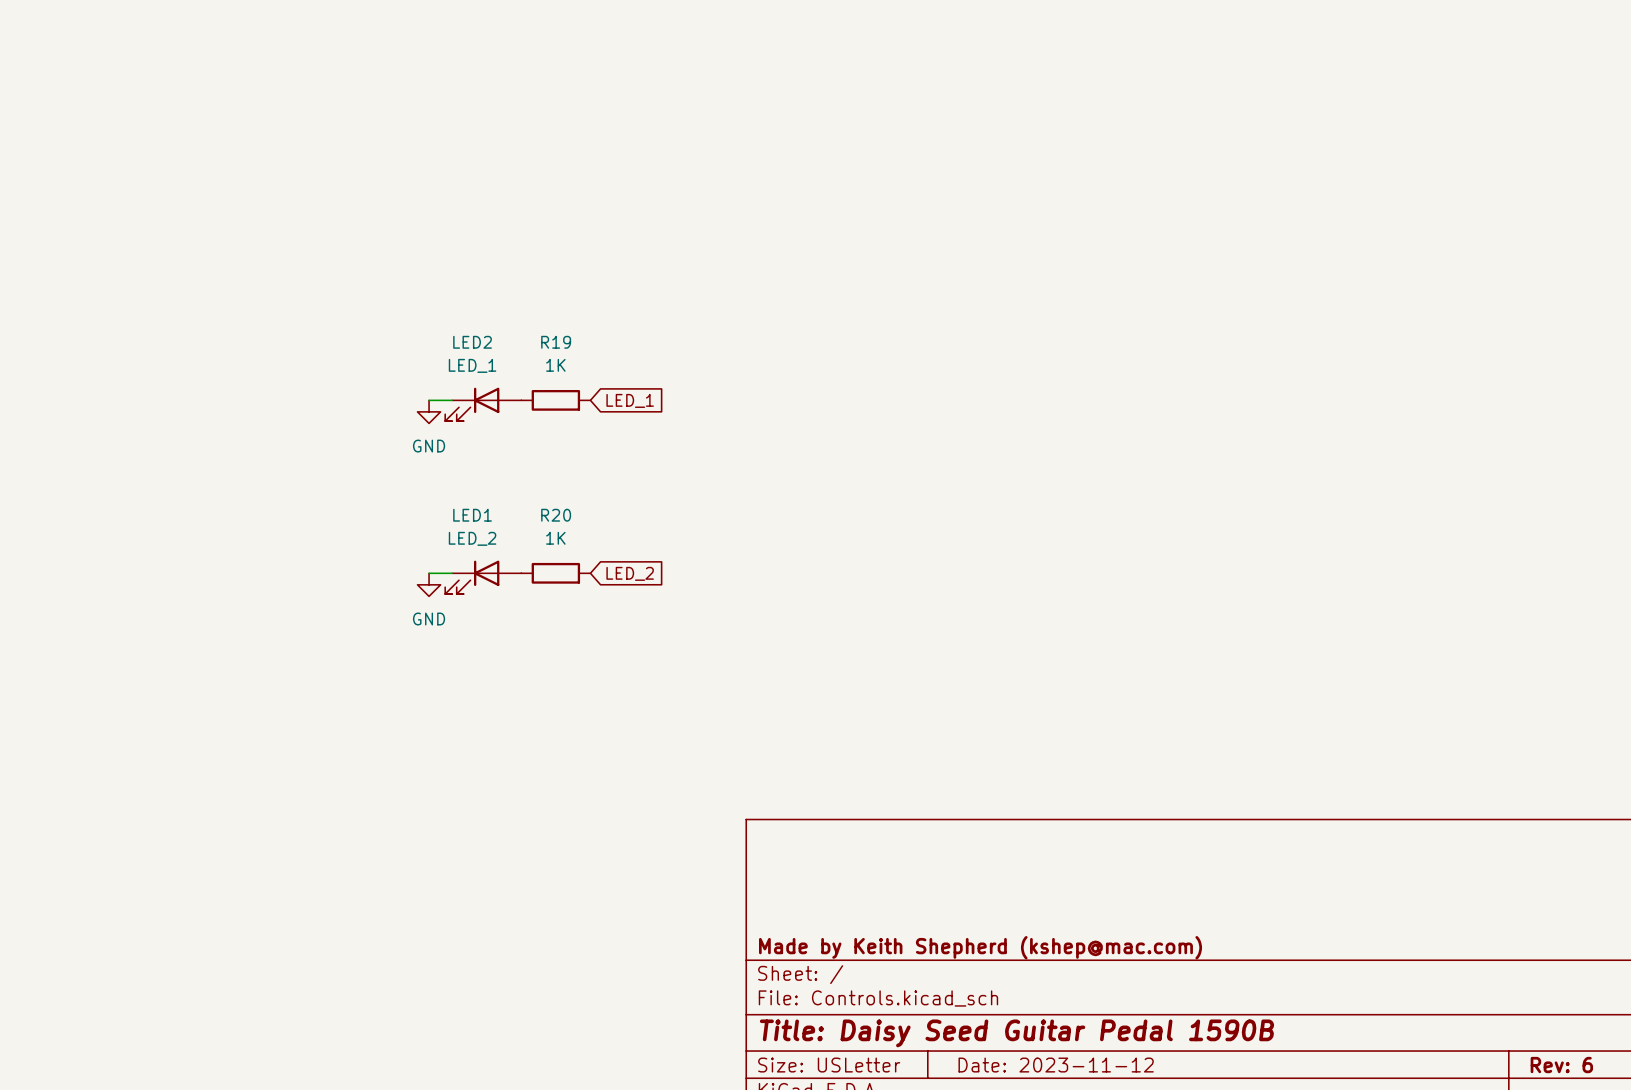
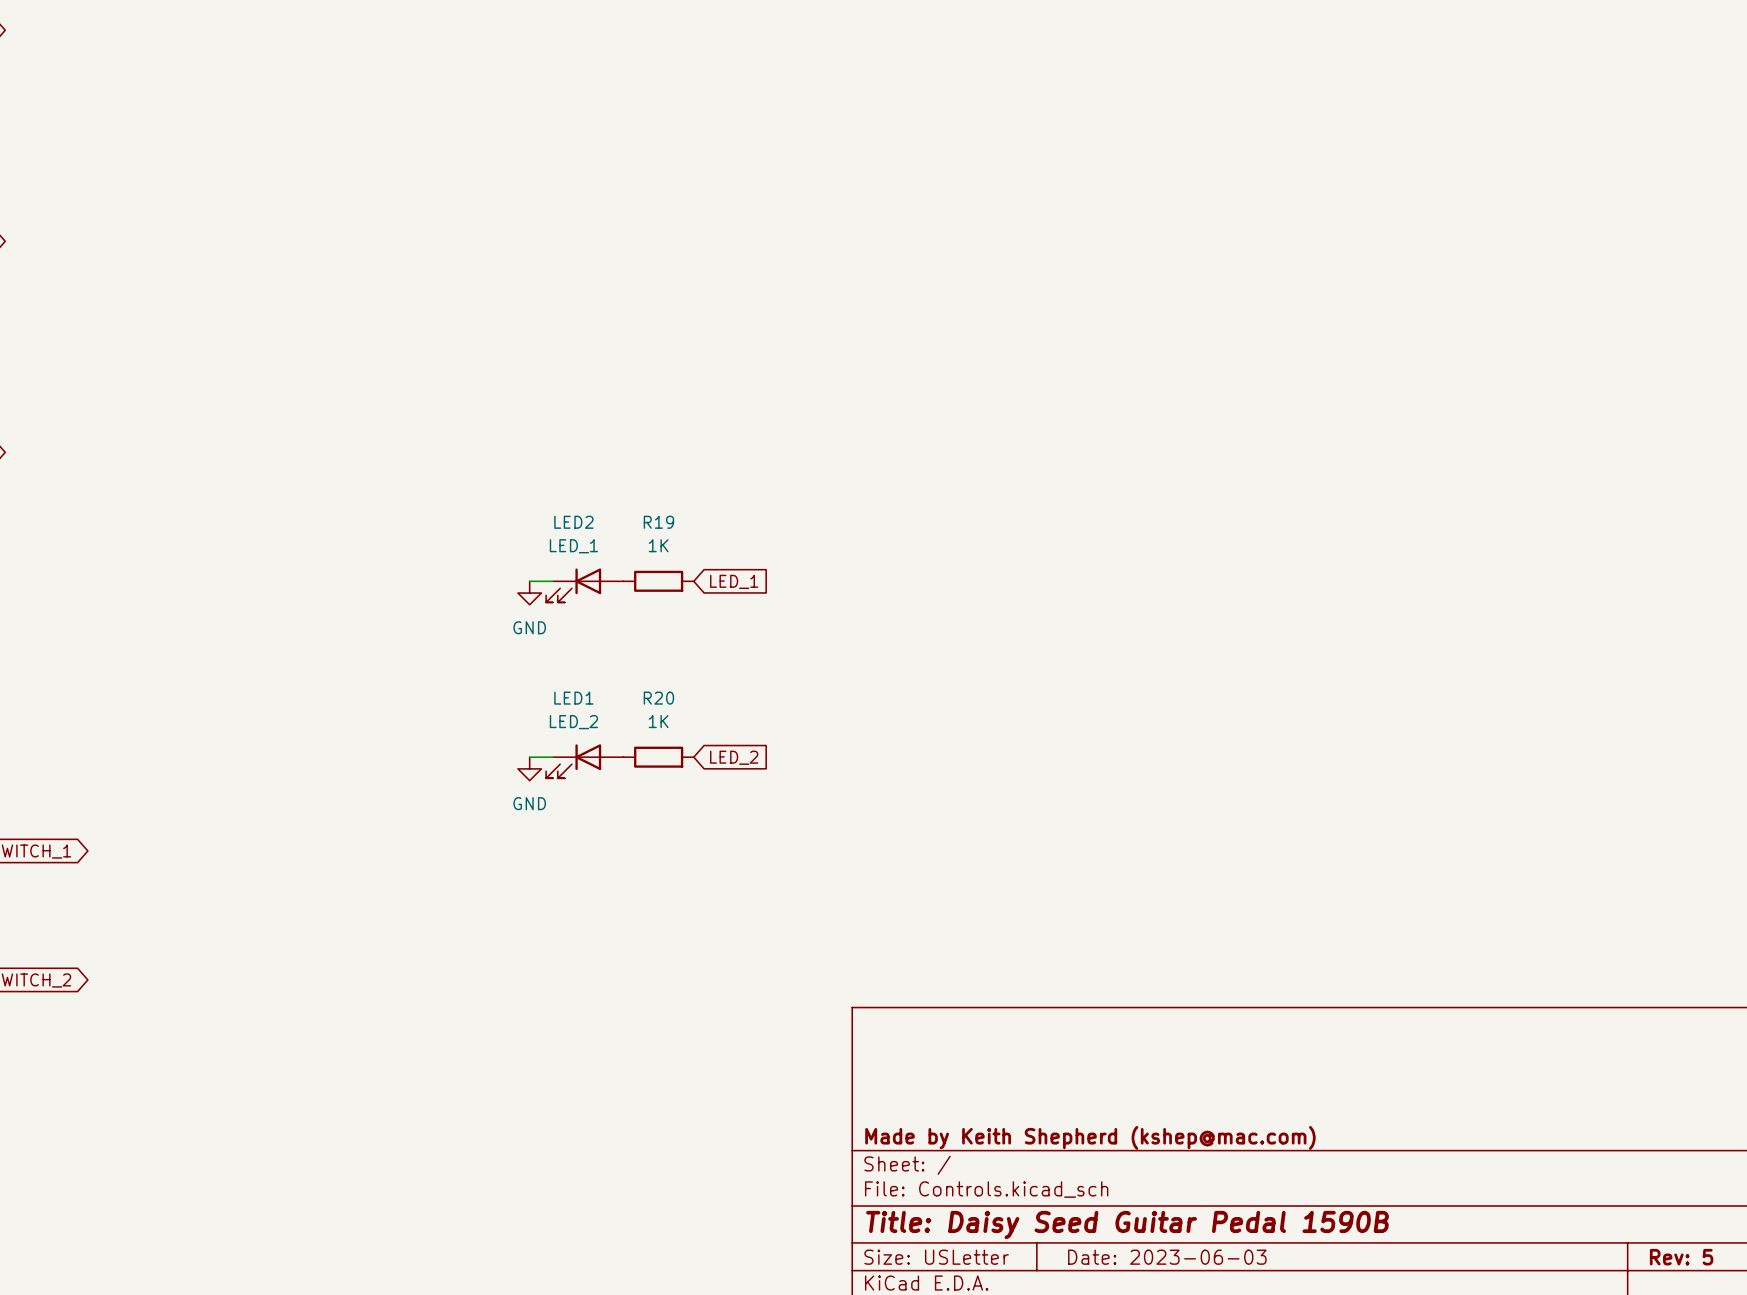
title block: Date: 2023-11-12 (1056, 1065) -> Date: 2023-06-03 (1167, 1257)
title block: Rev: 6 (1561, 1065) -> Rev: 5 (1681, 1257)

